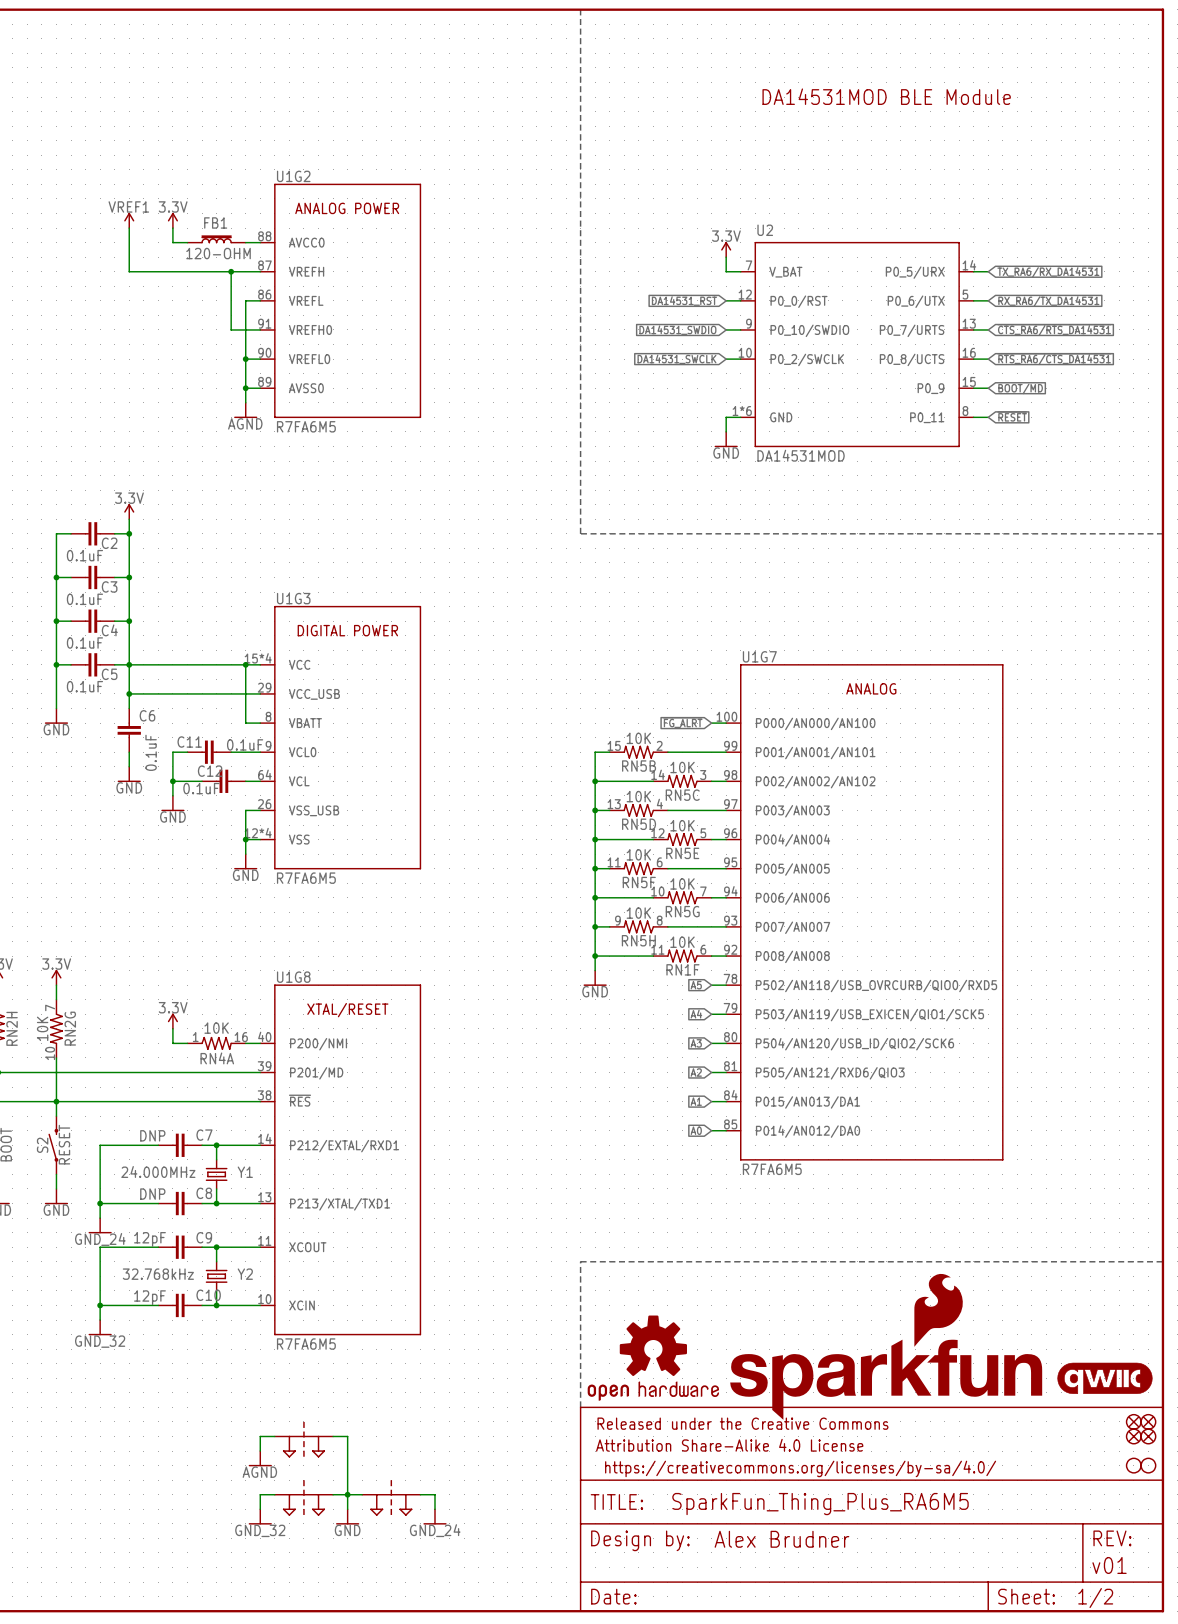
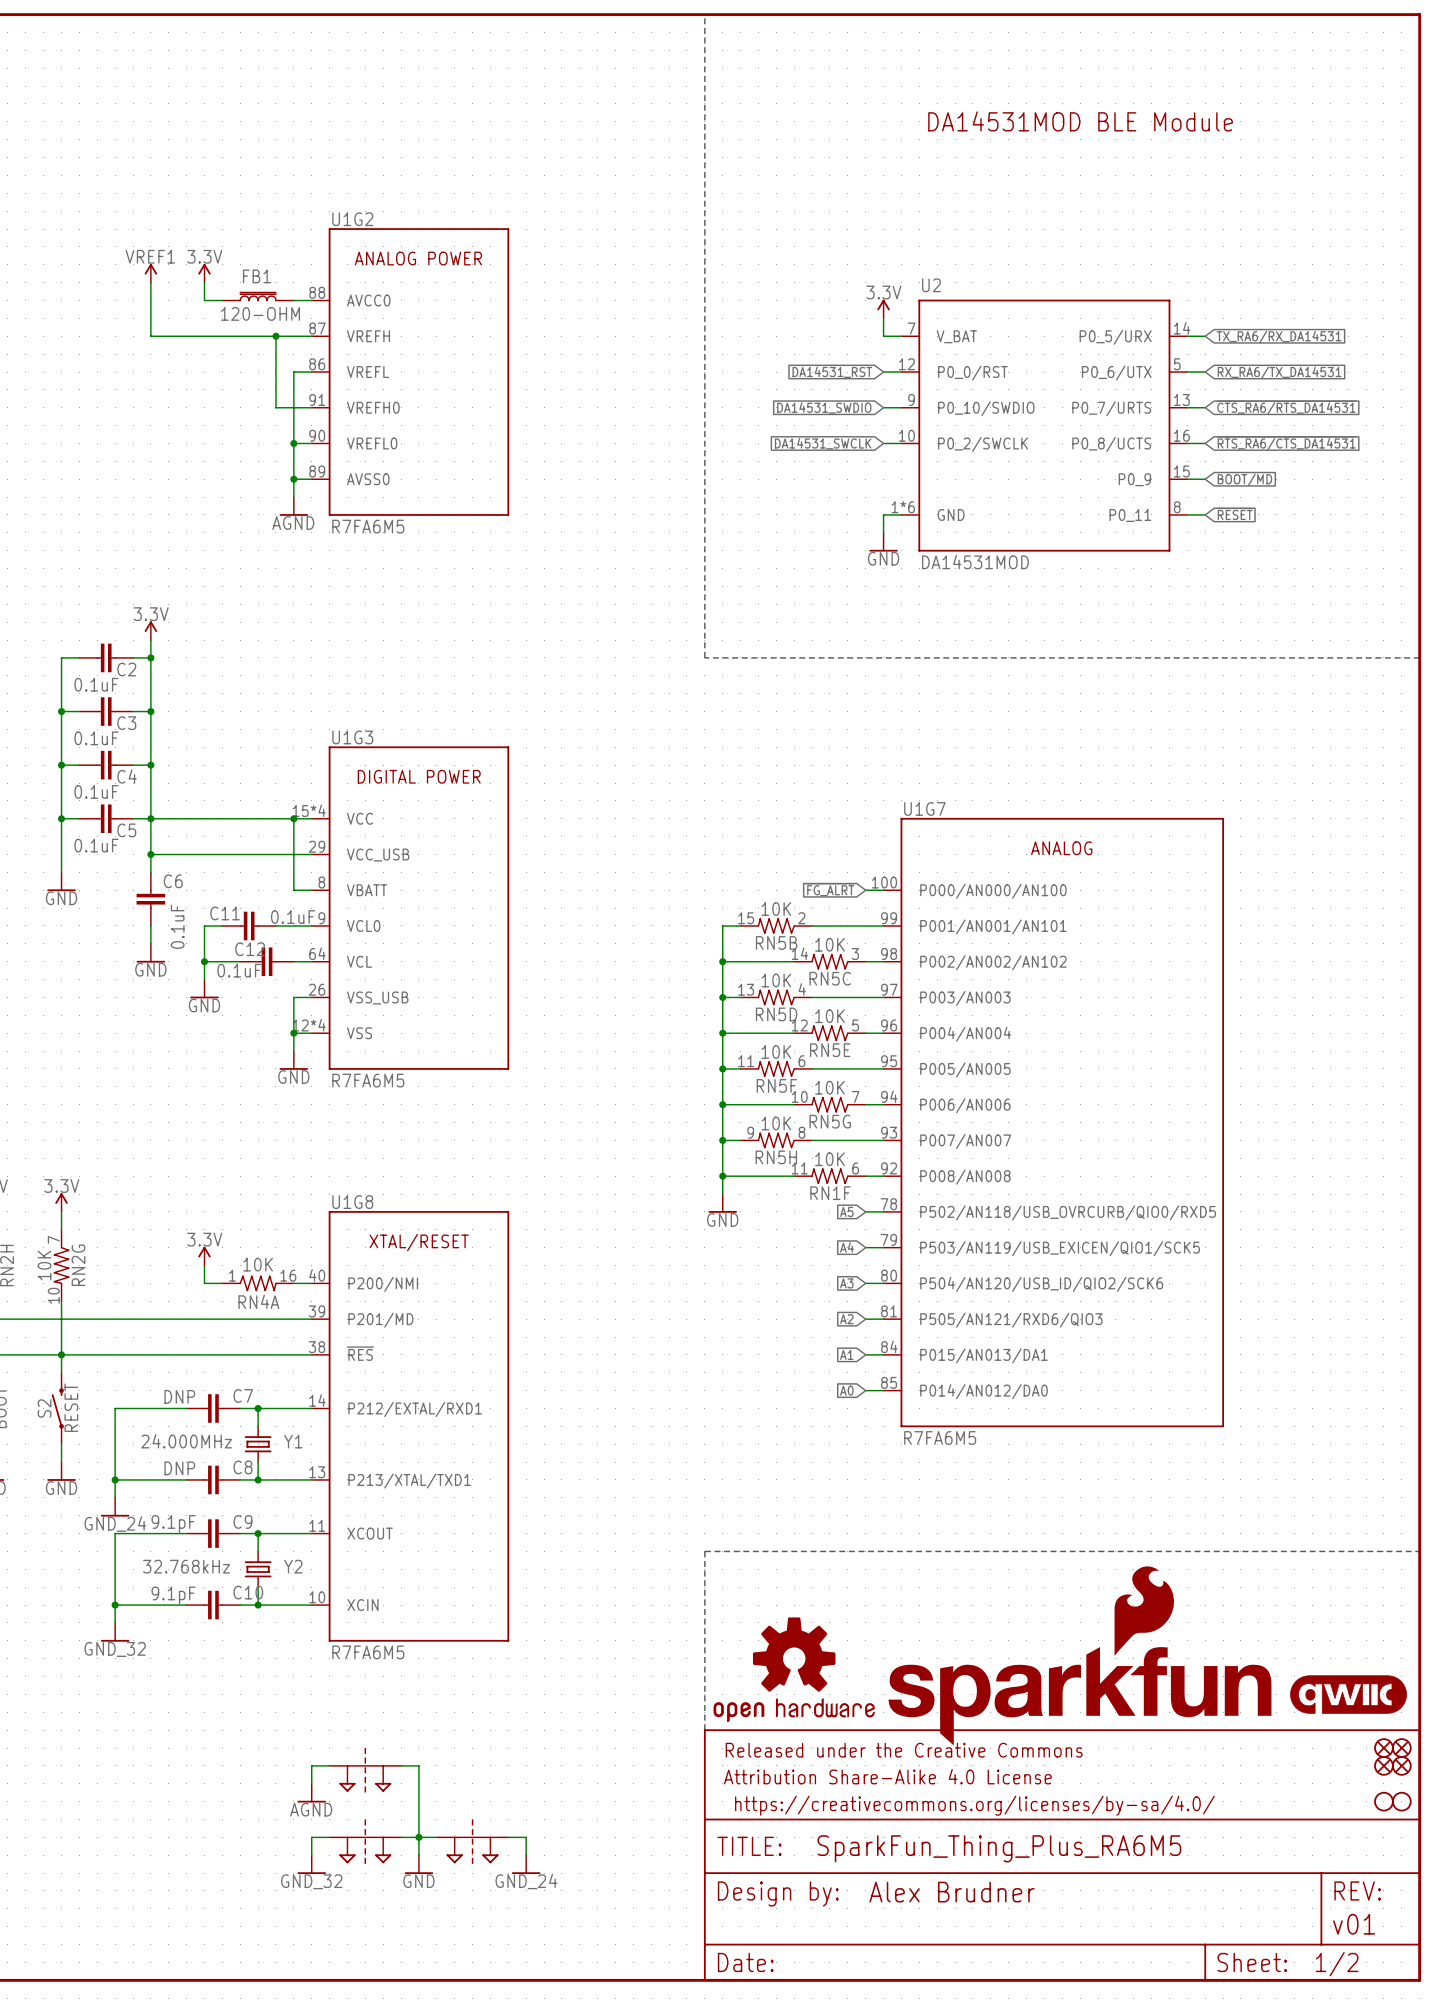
C9 value: 12pF (149, 1239) -> 9.1pF (173, 1524)
C10 value: 12pF (149, 1297) -> 9.1pF (173, 1595)

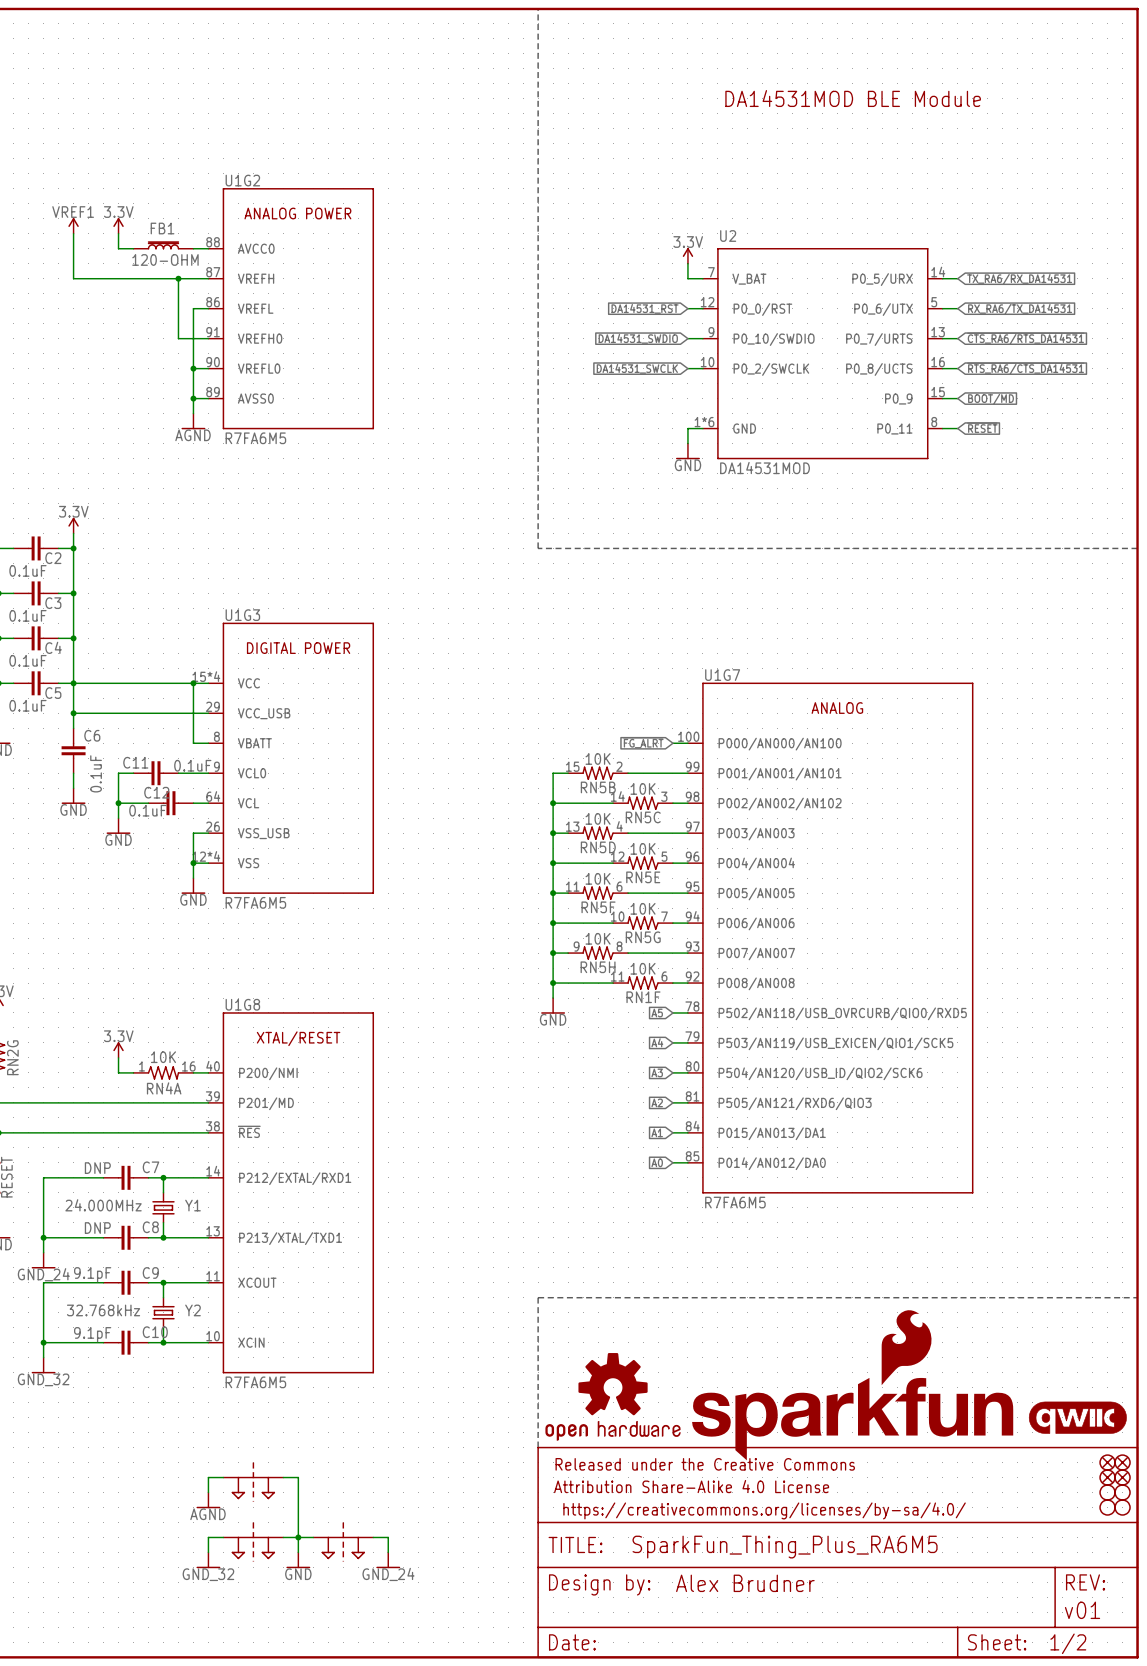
part: none -> (1107, 1492)
part: none -> (1122, 1492)

